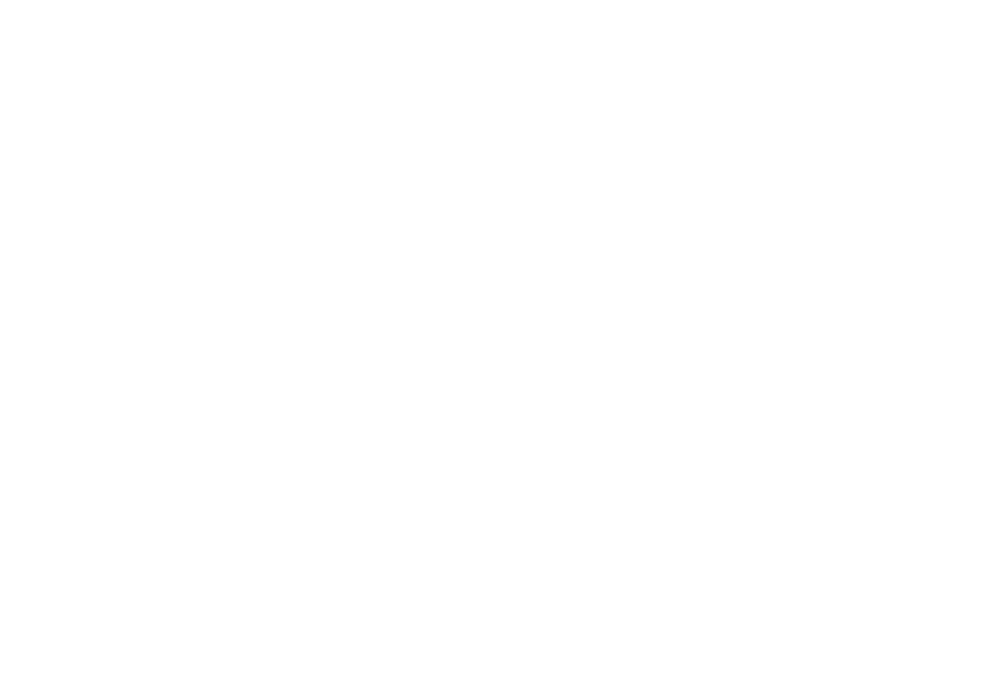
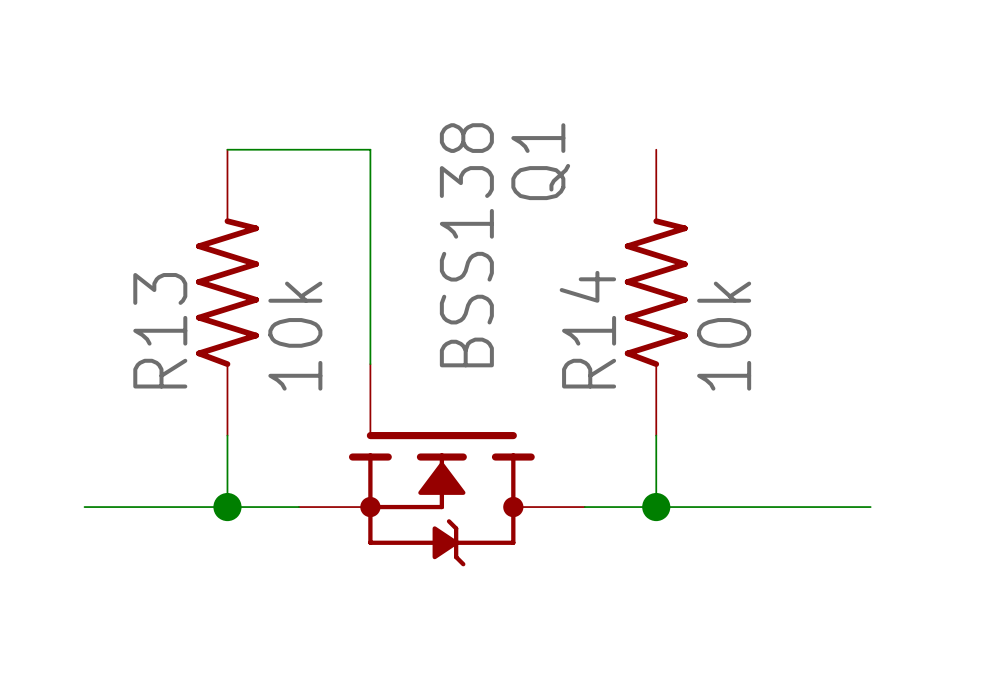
wire: none -> (227, 149) (370, 149) (370, 364)
R13: none -> 10k (227, 292)
R14: none -> 10k (656, 292)
wire: none -> (227, 435) (227, 507)
wire: none -> (656, 435) (656, 507)
Q1: none -> BSS138 (441, 465)
wire: none -> (84, 507) (298, 507)
junction: none -> (227, 507)
wire: none -> (584, 507) (870, 507)
junction: none -> (656, 507)

